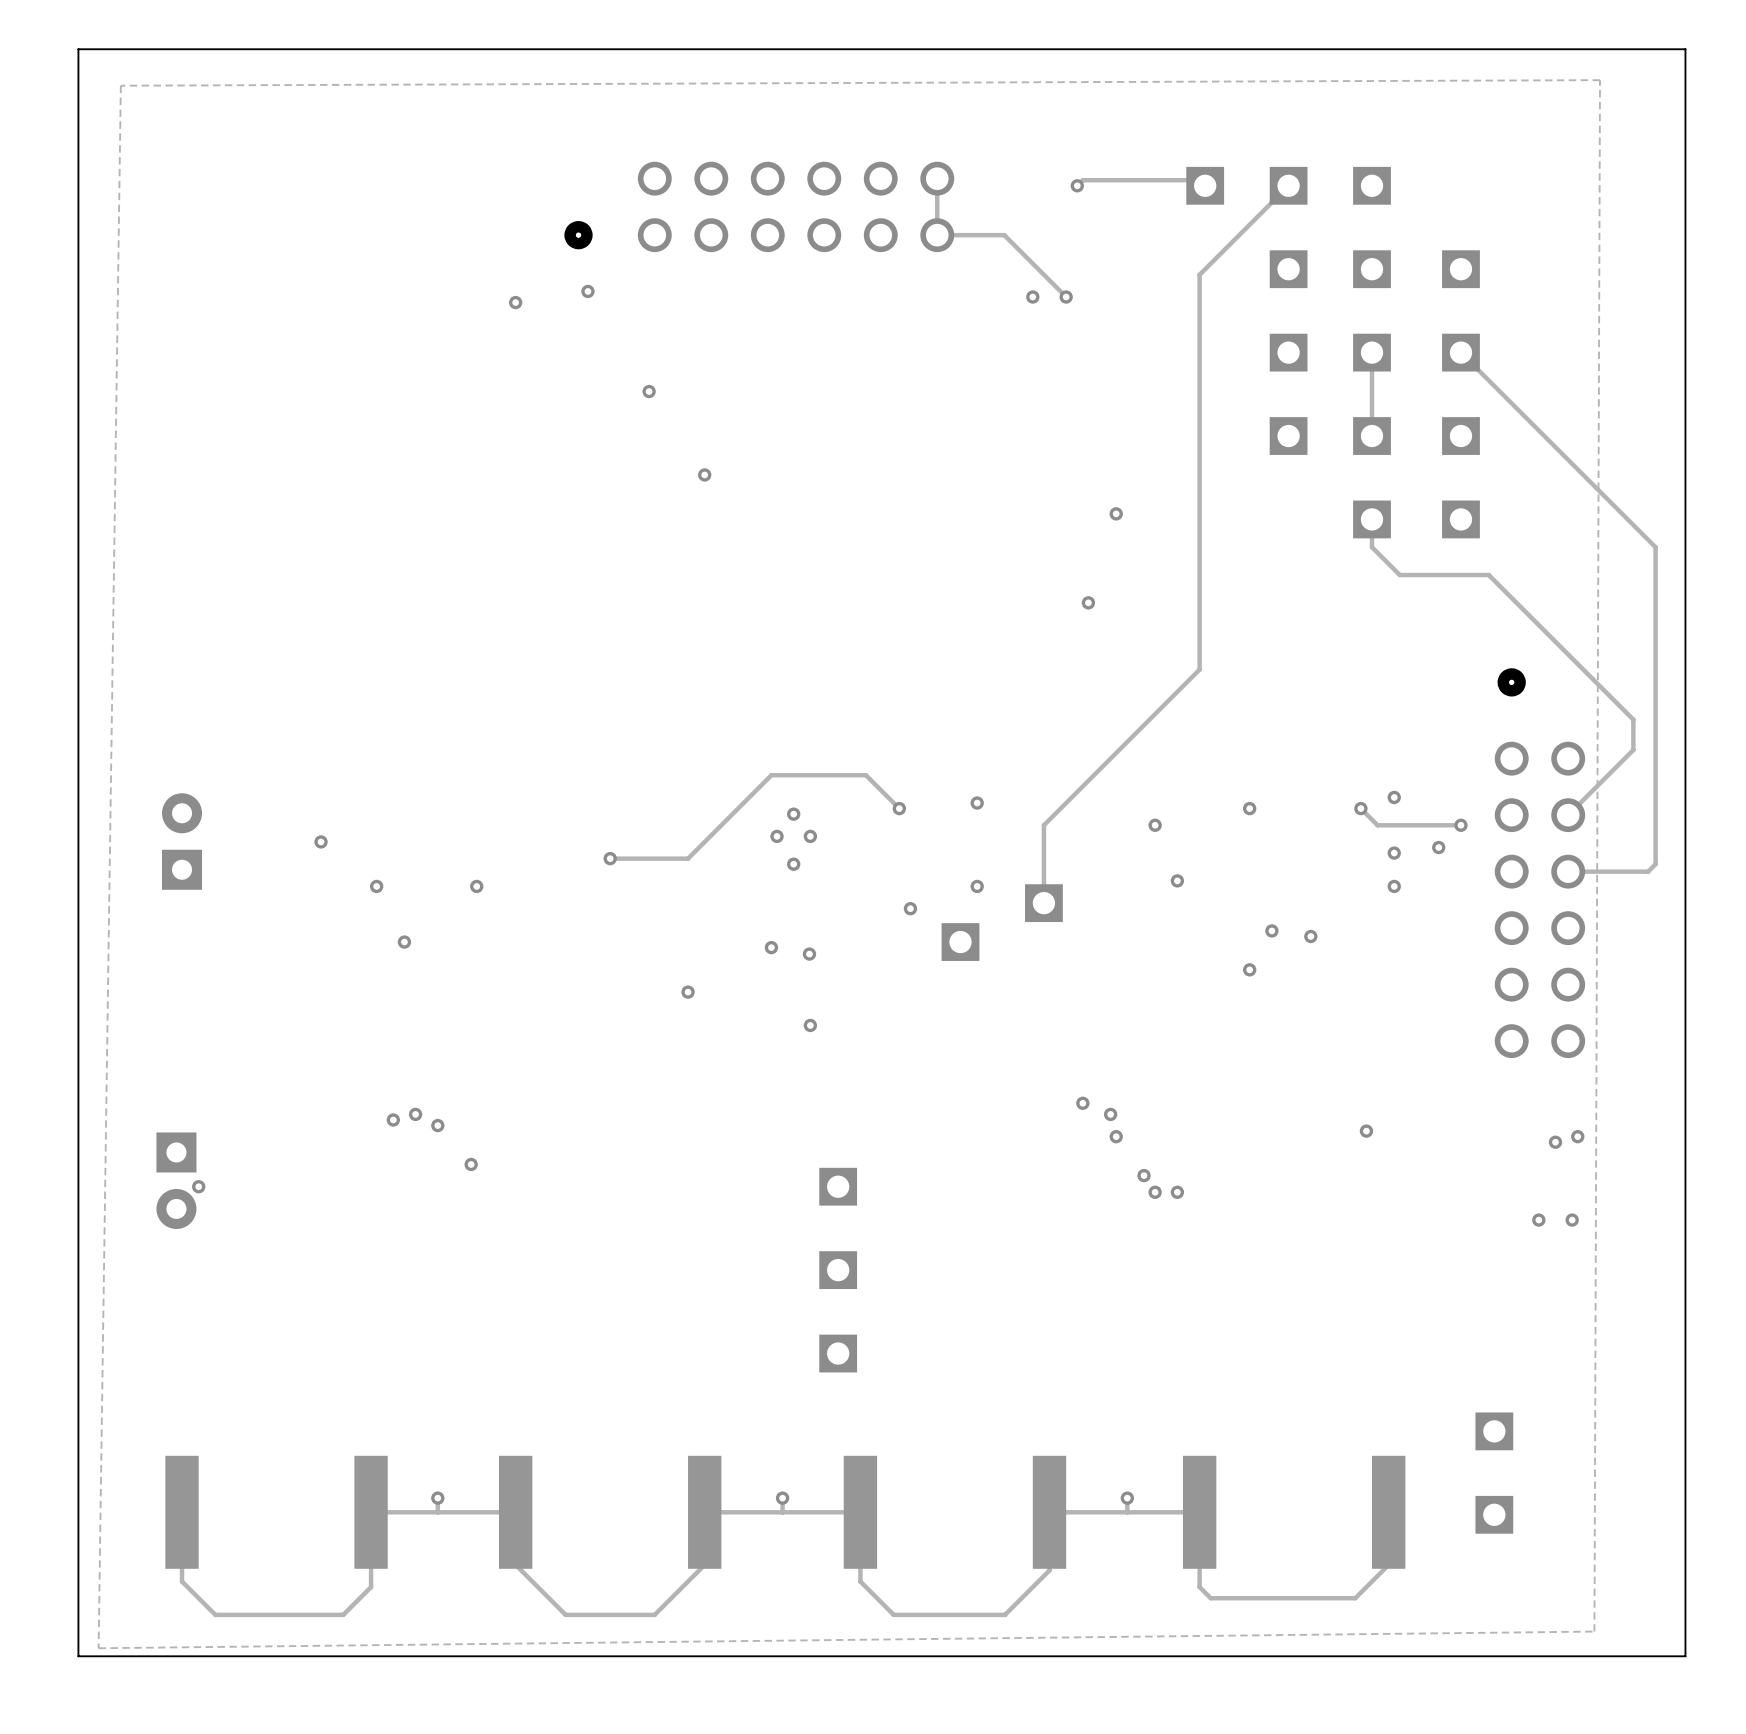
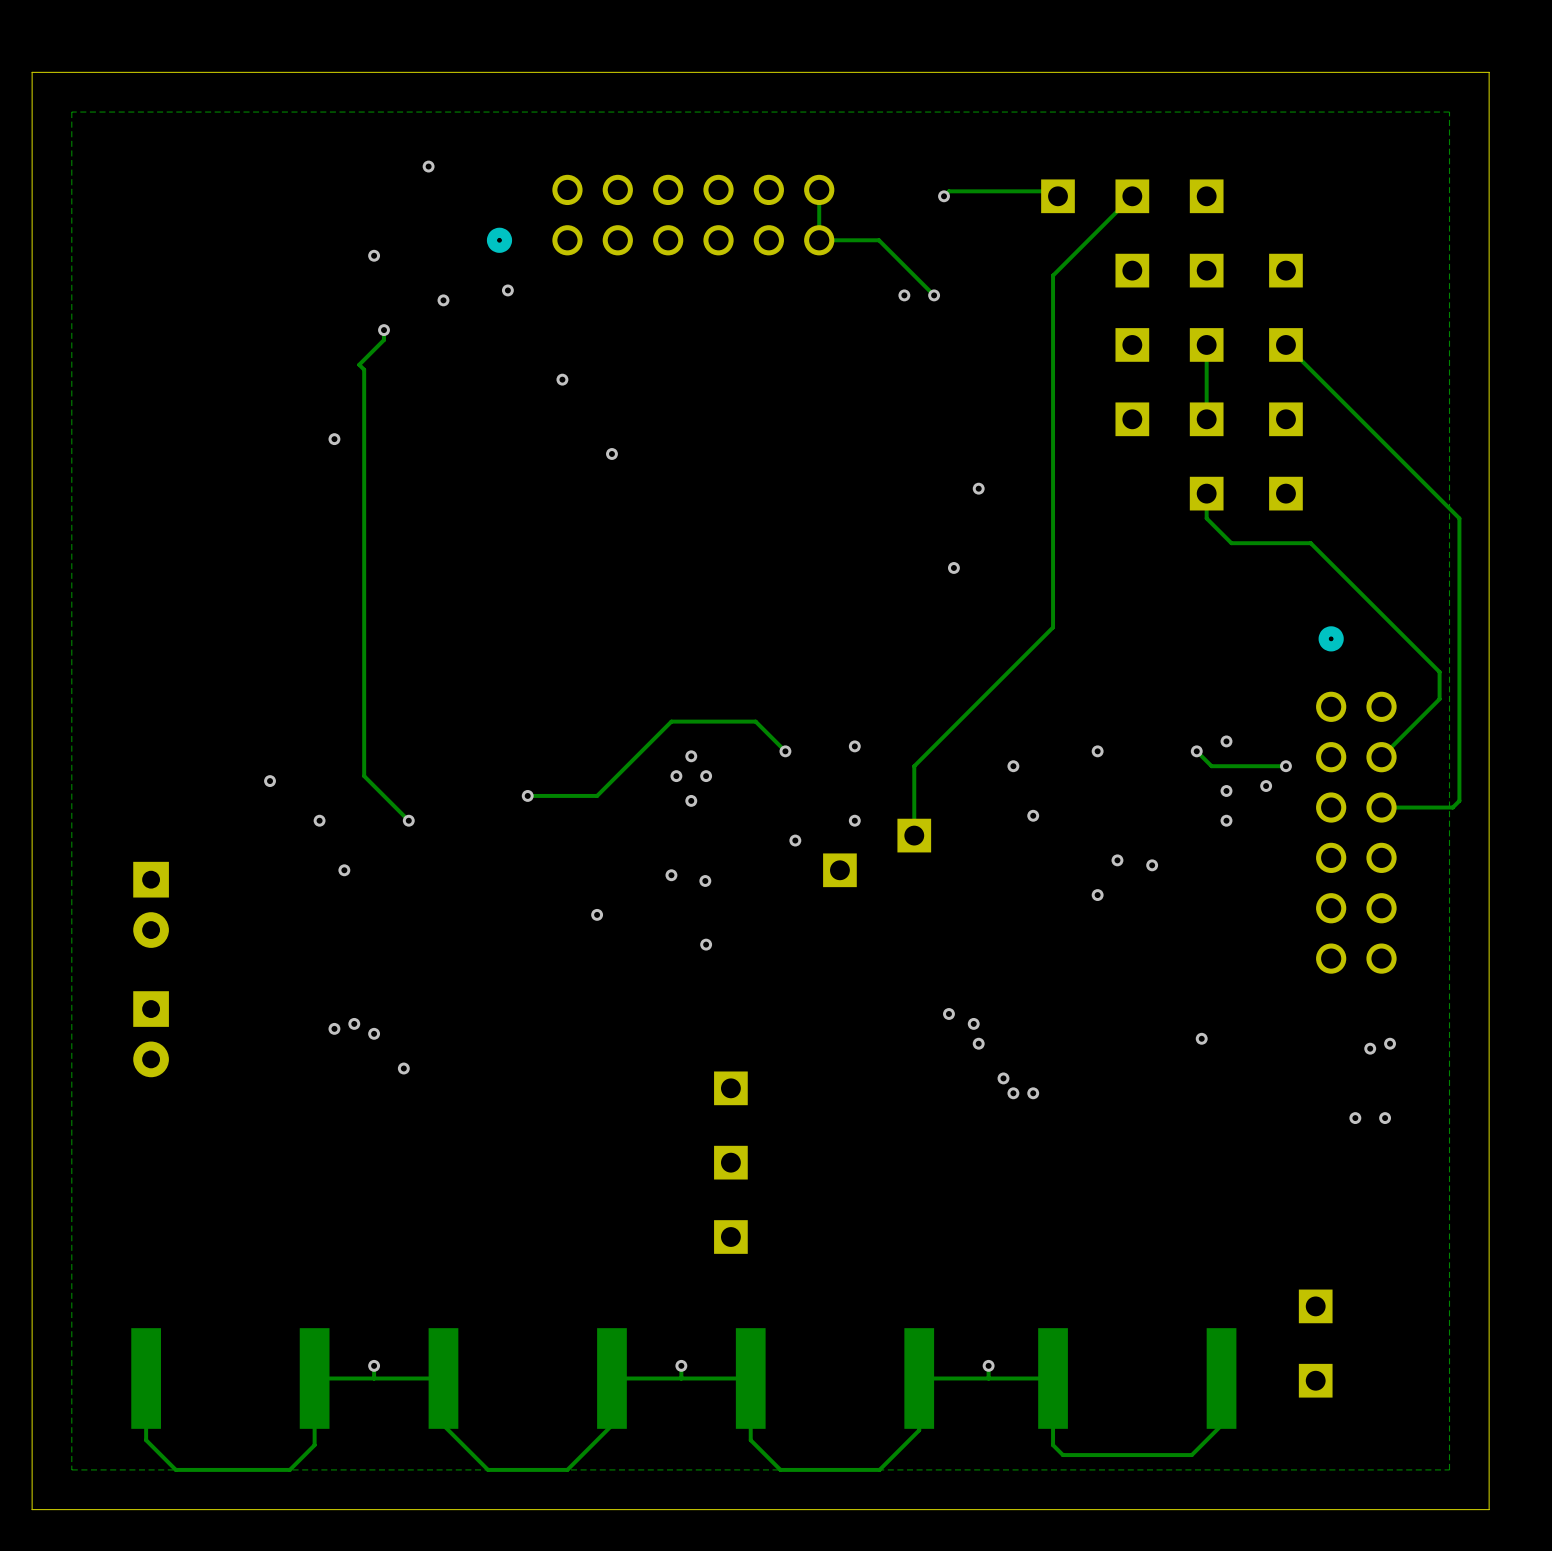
board edge: (1685, 49) (78, 49) (78, 1656) (1685, 1656) (1685, 49) -> (1489, 72) (1489, 1509) (32, 1509) (32, 72) (1489, 72)
zone outline: (1599, 80) (120, 85) (98, 1648) (1594, 1631) (1599, 80) -> (1449, 112) (1449, 1469) (71, 1469) (71, 112) (1449, 112)
via: none -> (428, 166)
via: none -> (374, 255)
track: none -> (384, 330) (384, 340) (359, 364) (364, 369) (364, 776) (408, 820)
via: none -> (384, 330)
via: none -> (334, 439)
part: (182, 841) -> none
part: none -> (151, 904)
part position: (176, 1180) -> (151, 1034)
via: (198, 1186) -> none

